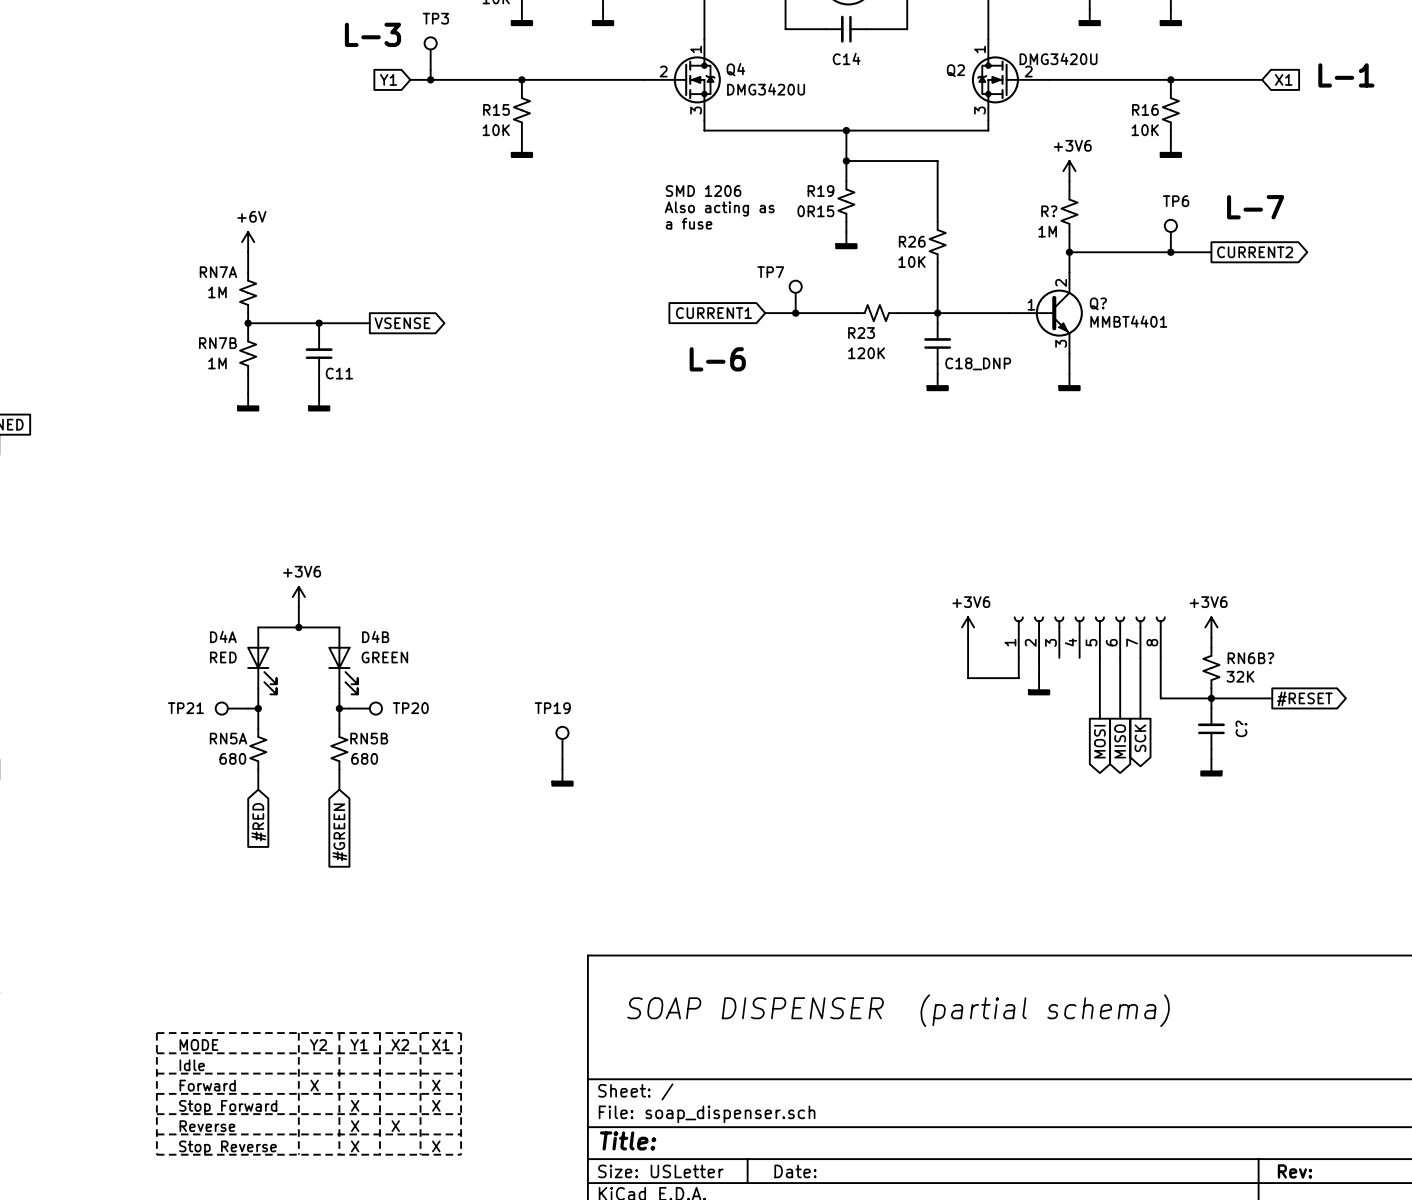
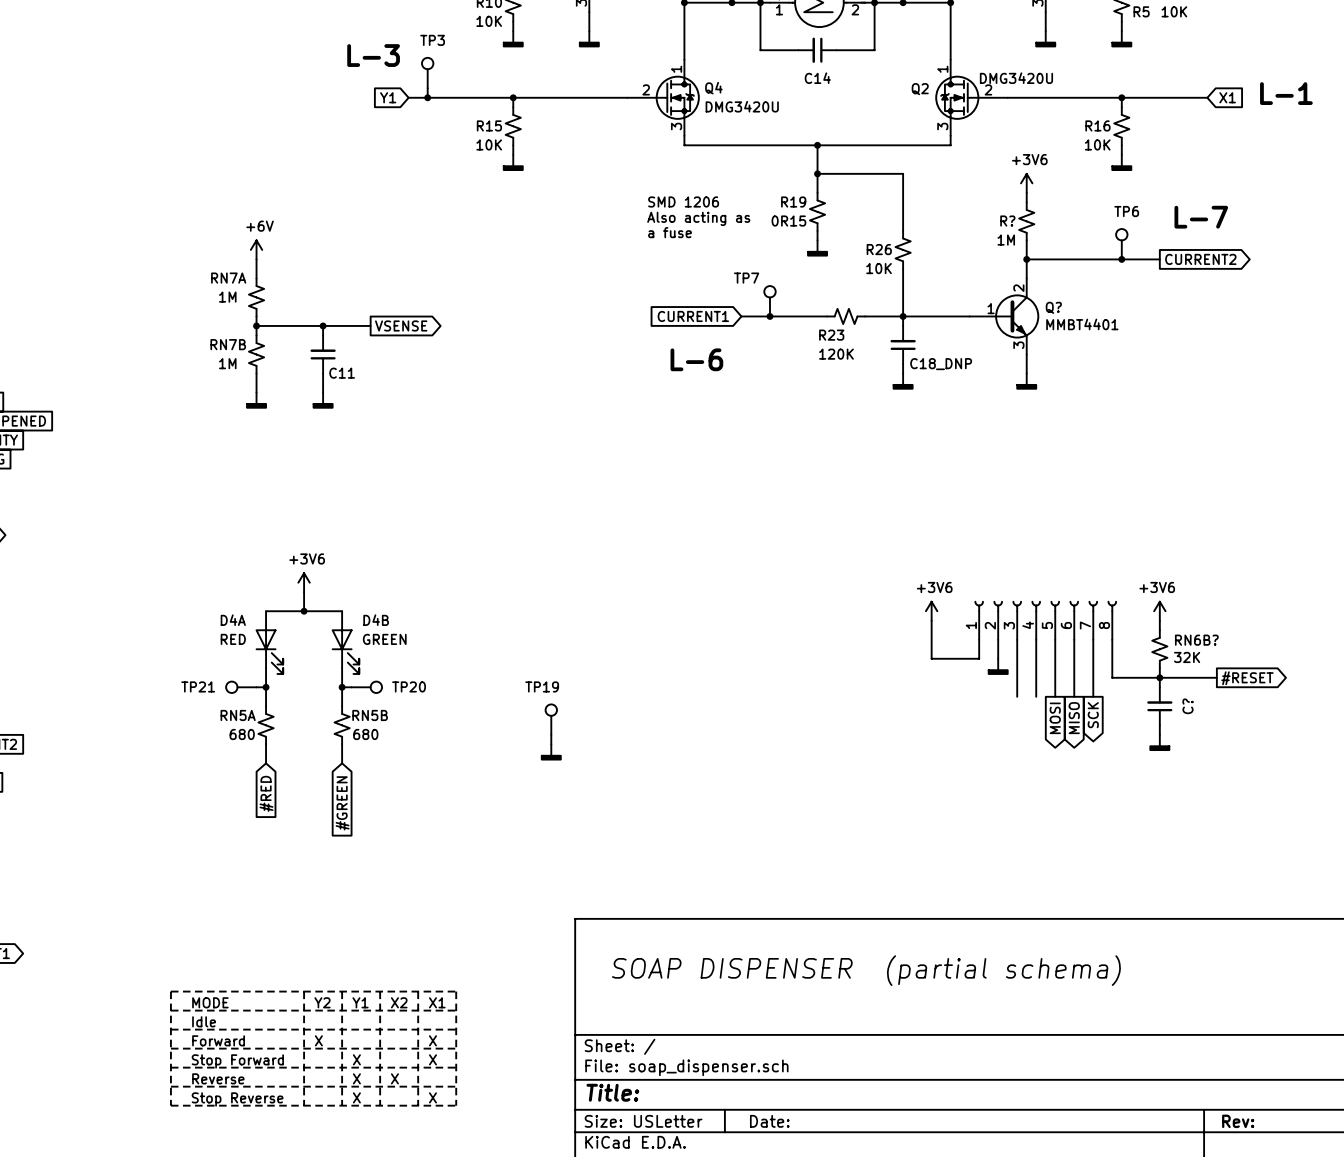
wire: none -> (1017, 639) (1017, 696)
wire: none -> (1036, 639) (1036, 696)

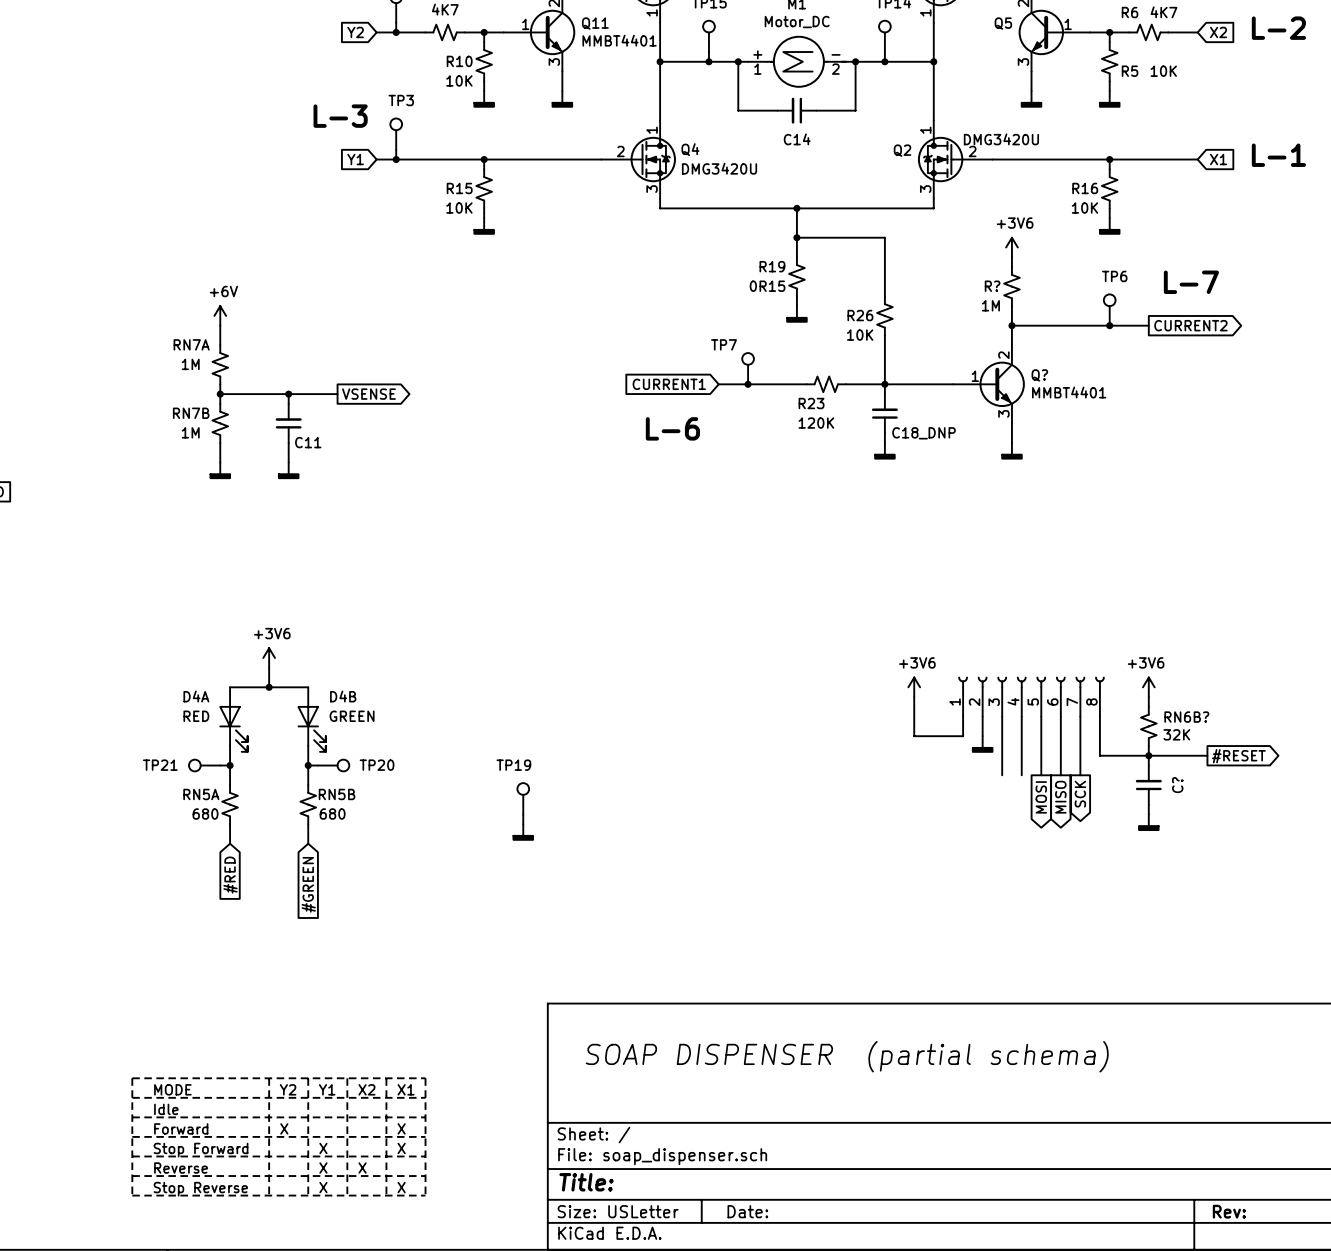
text: SMD 1206 (683, 201) -> none
text: Also acting as (698, 218) -> none
text: a fuse (669, 232) -> none

